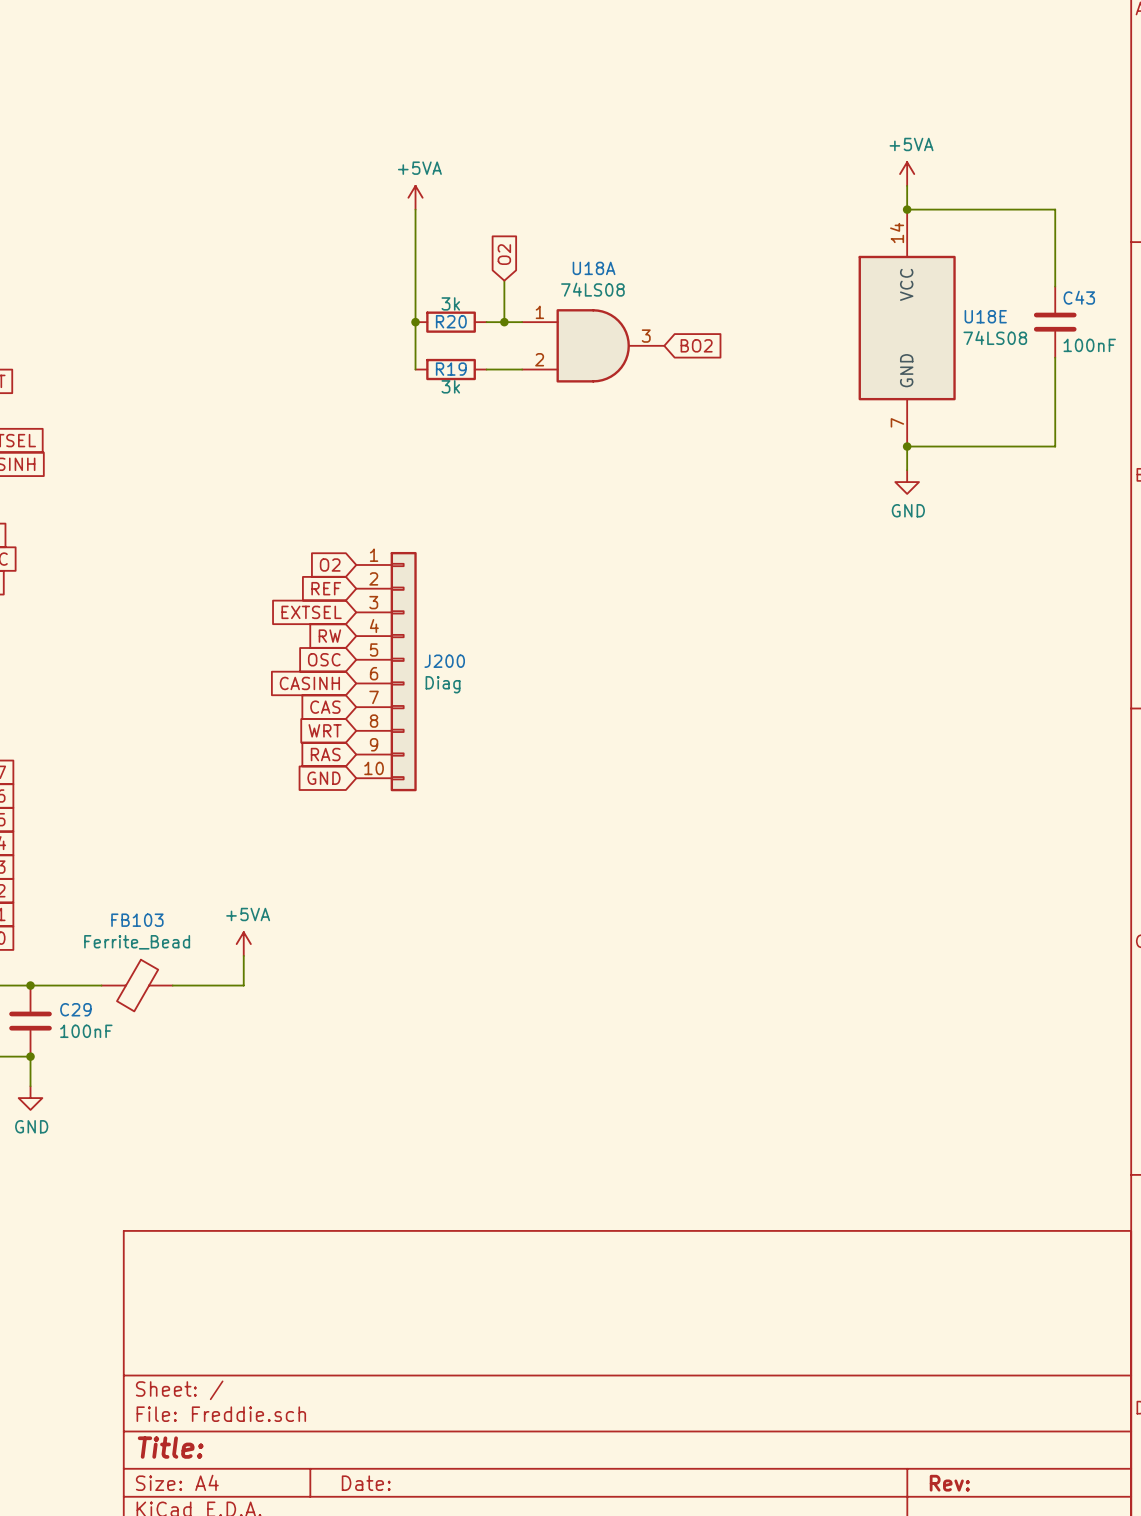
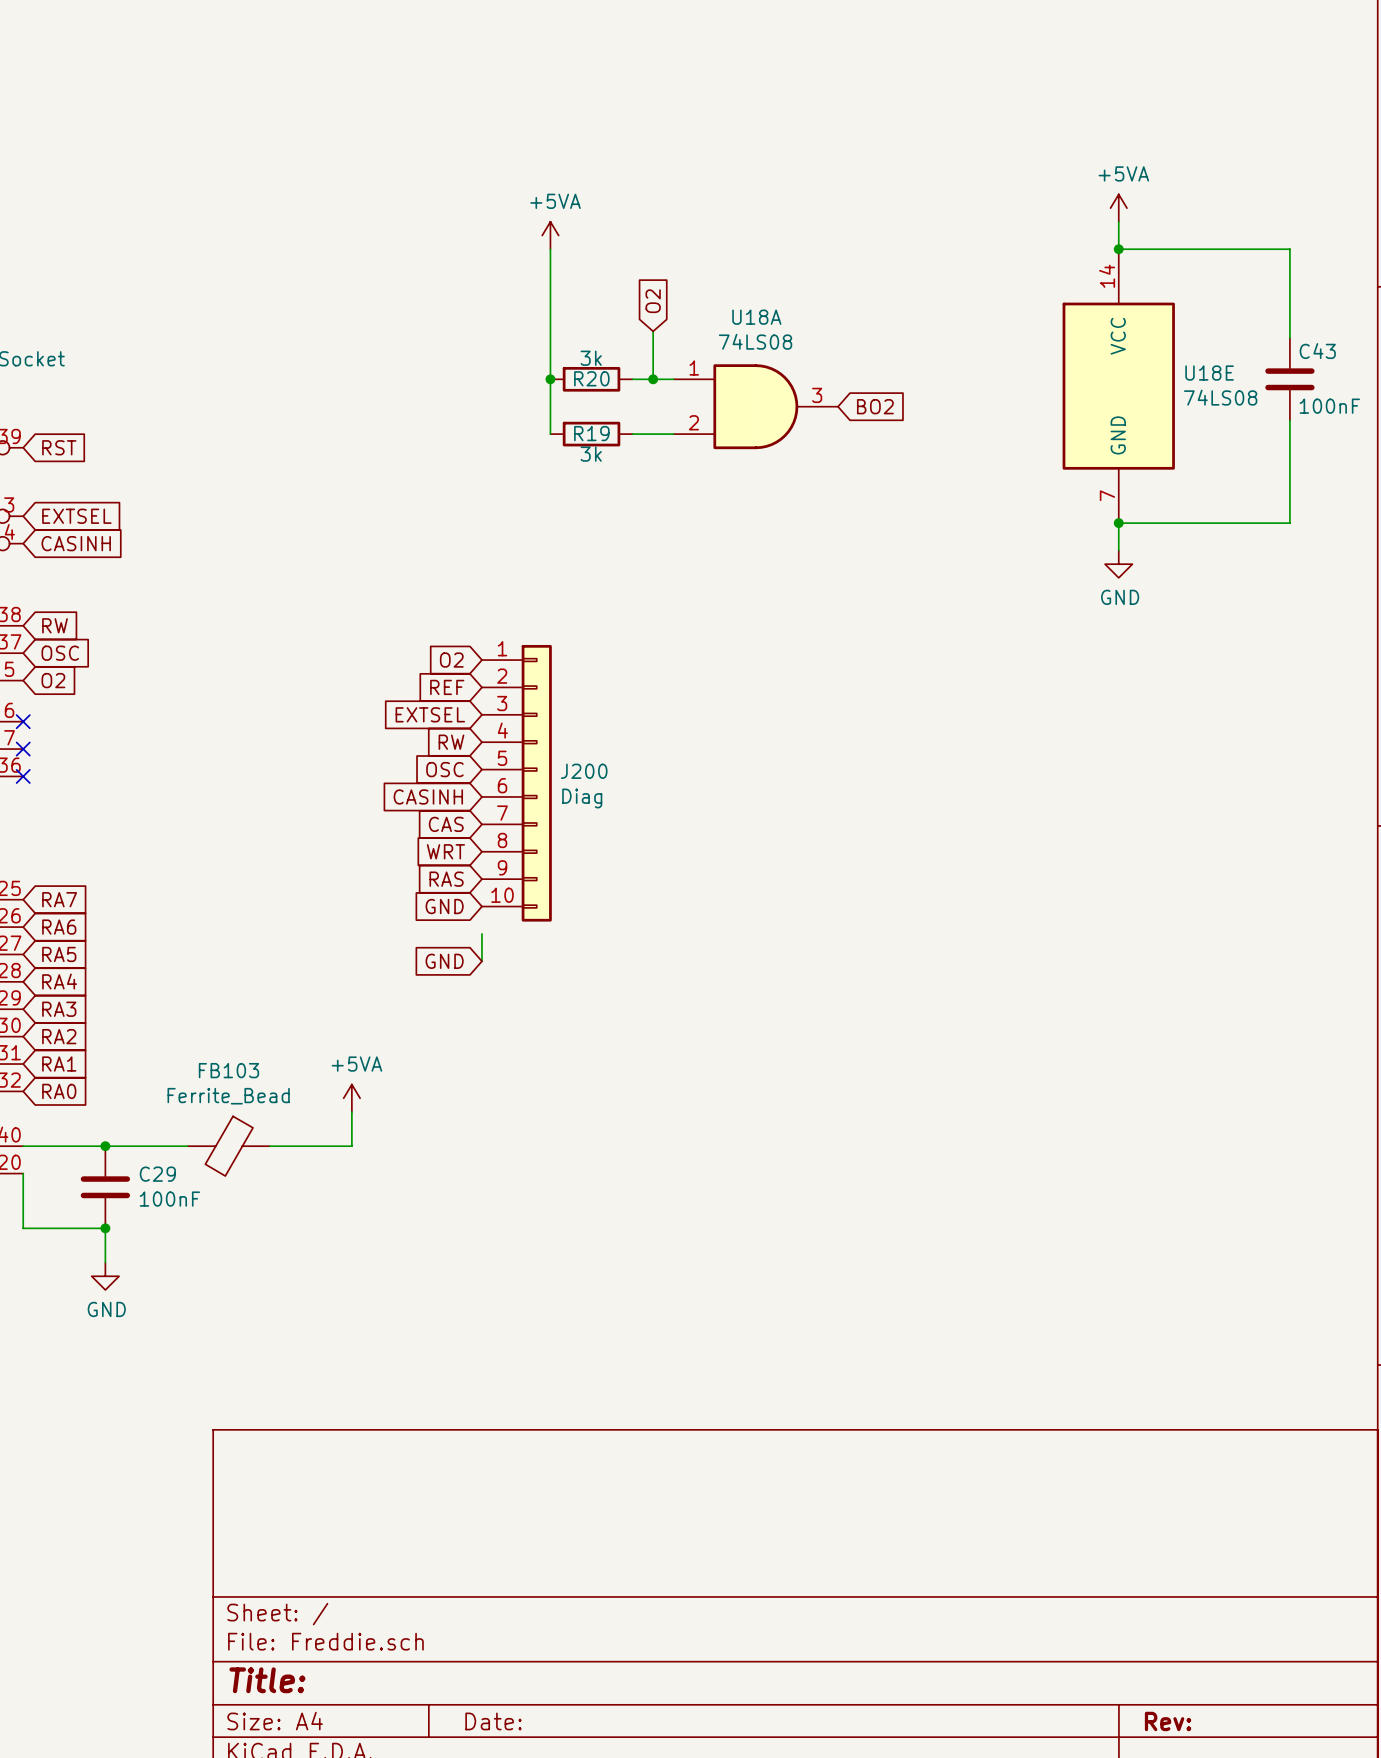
wire: none -> (481, 933) (481, 961)
global label: none -> GND (444, 961)

